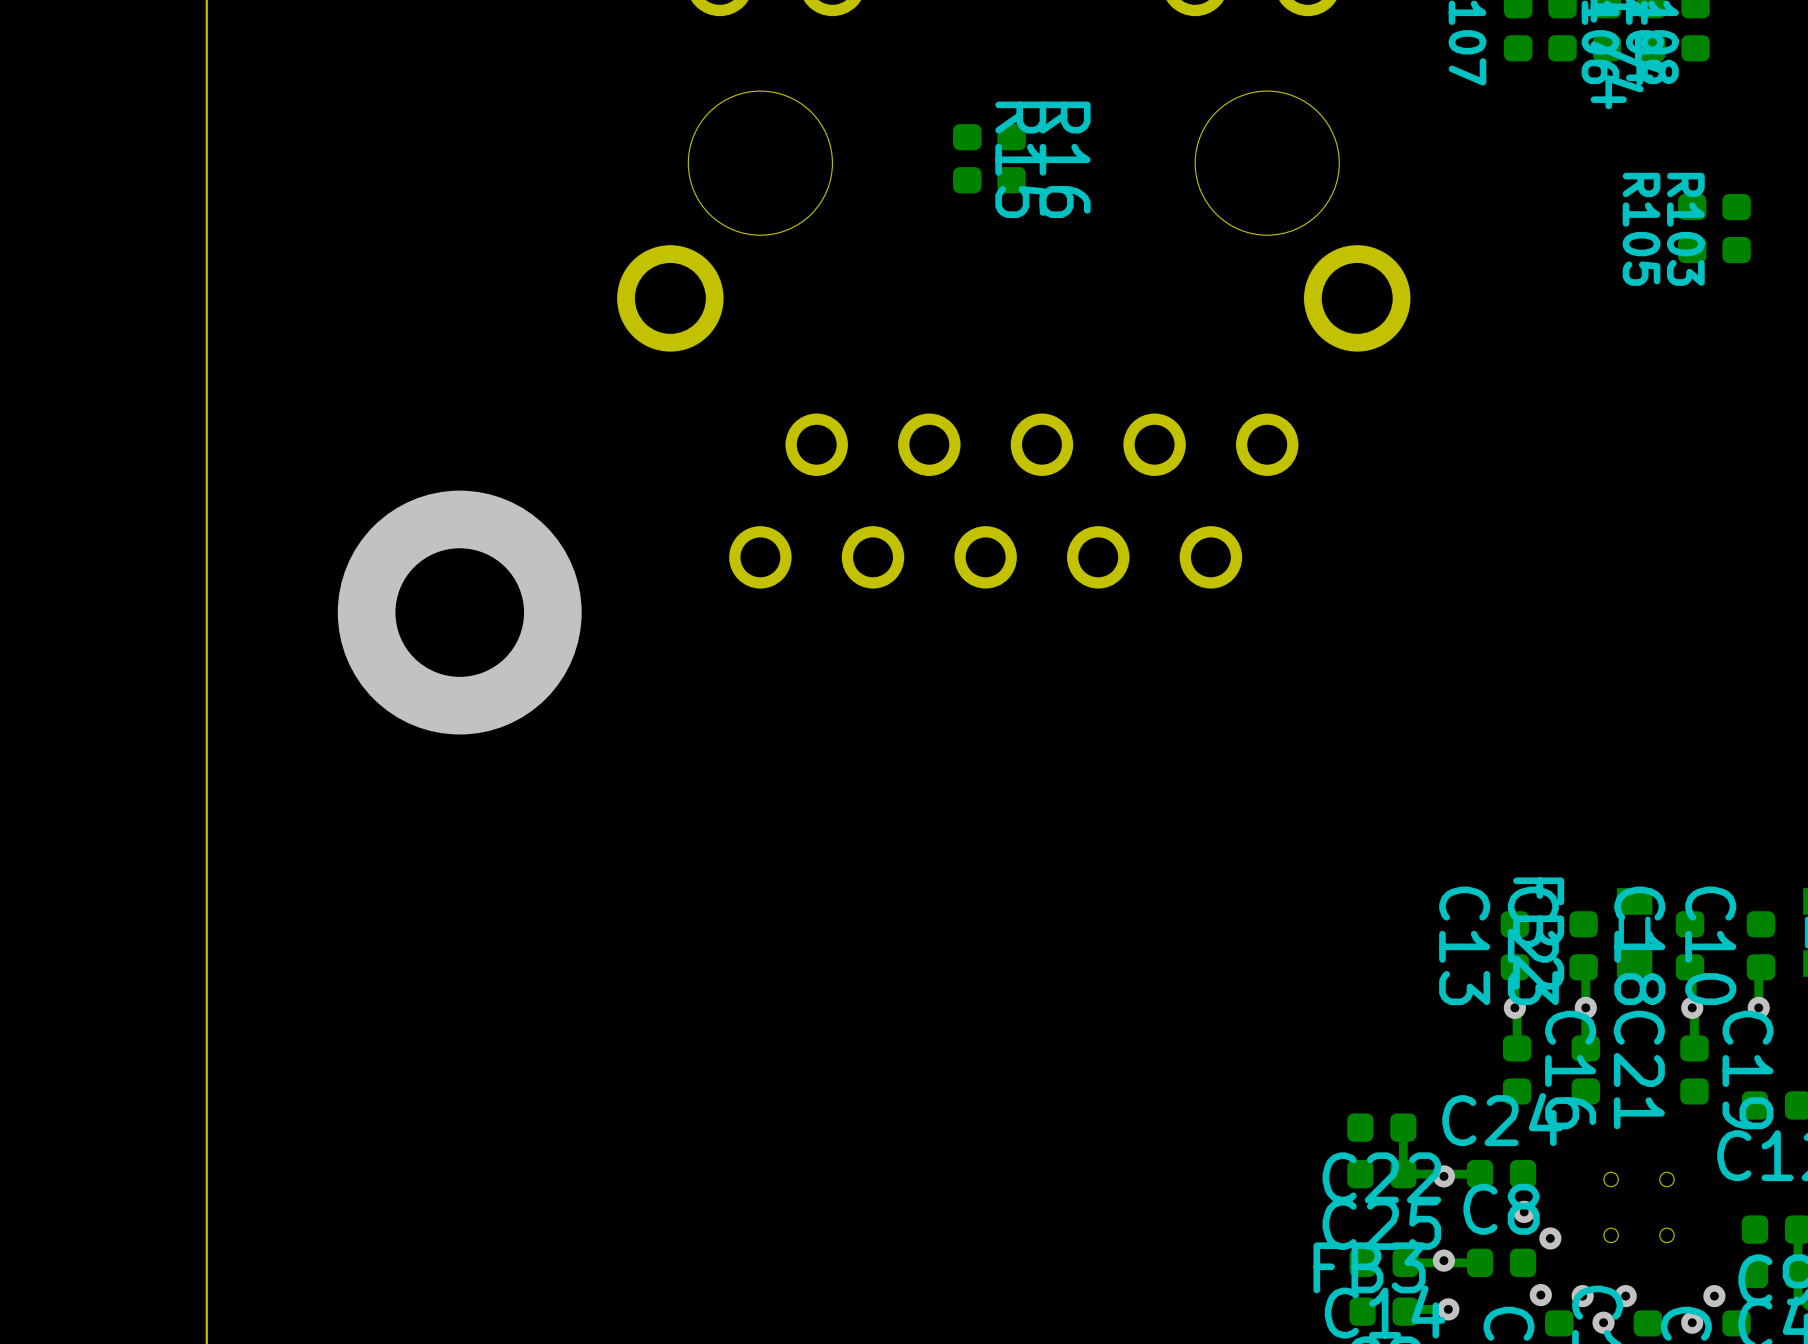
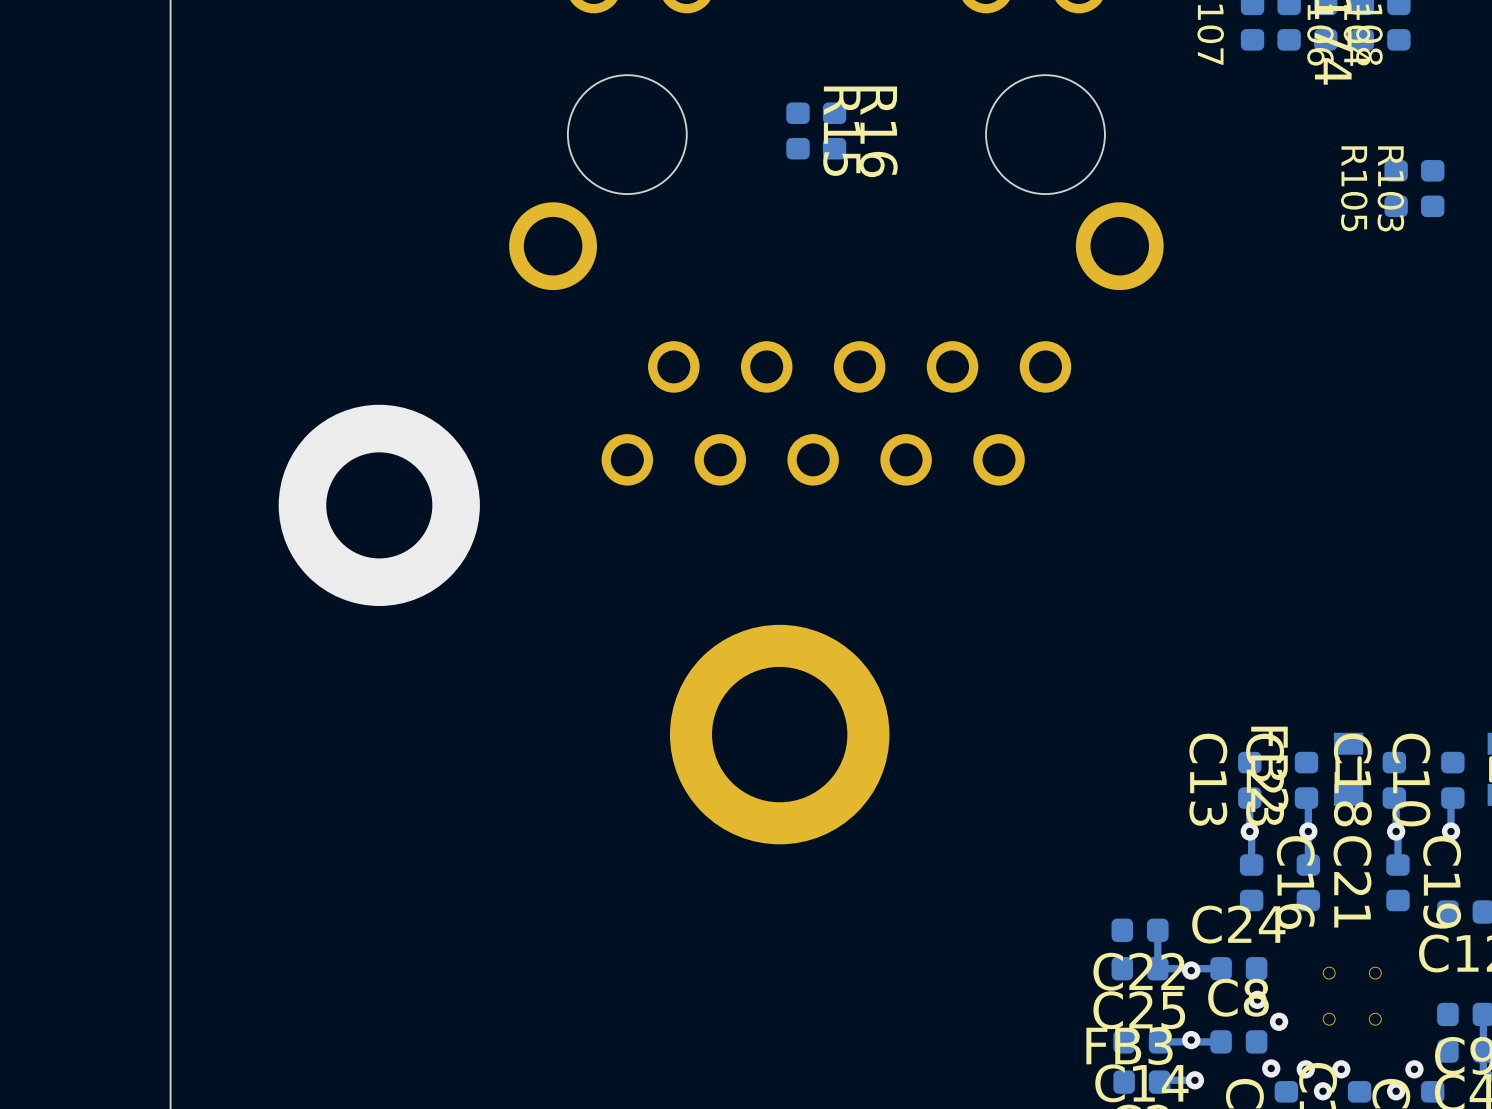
part: none -> (779, 734)

